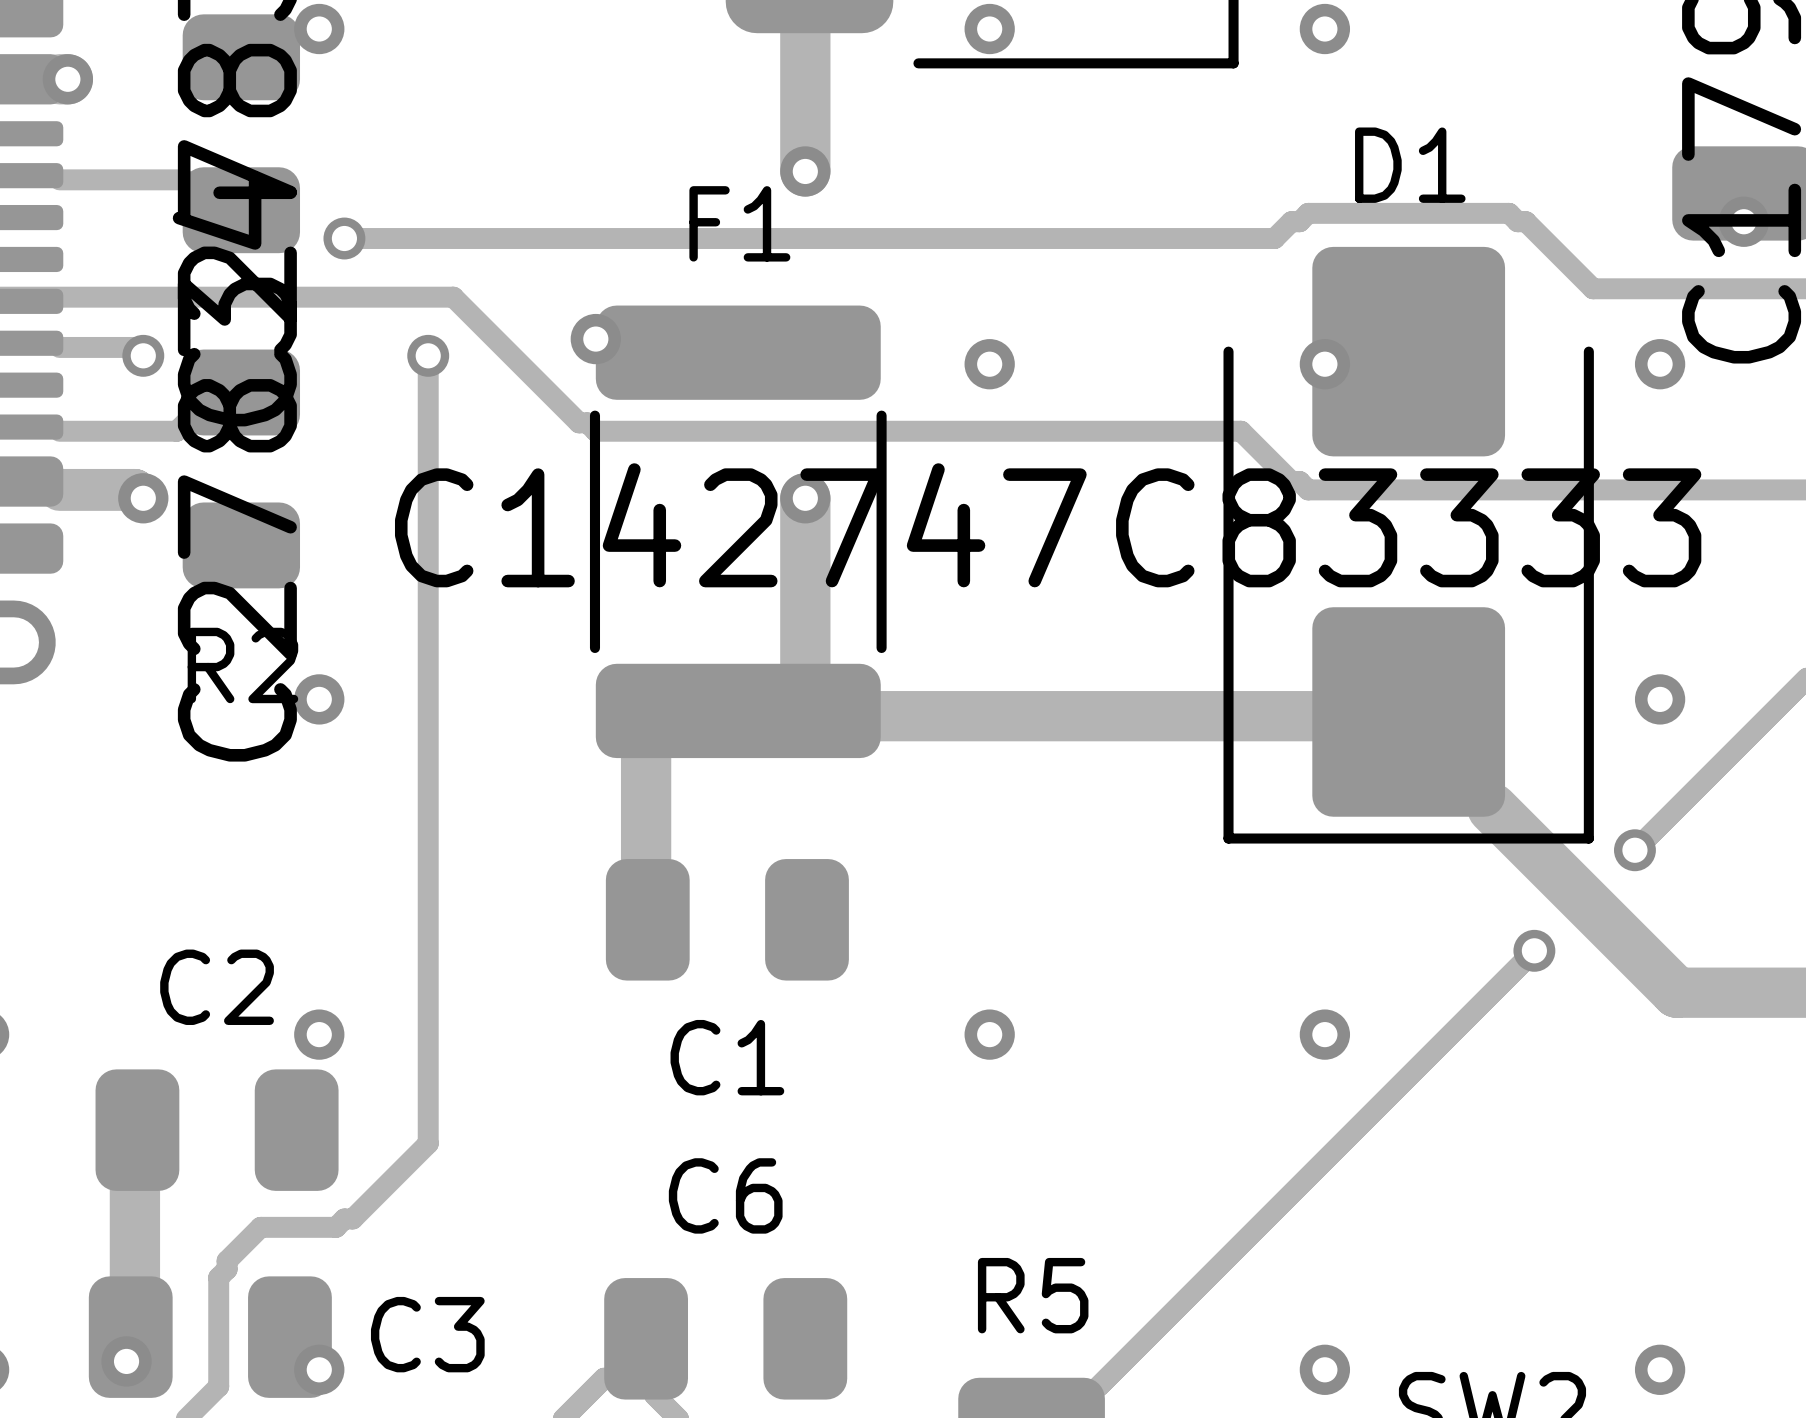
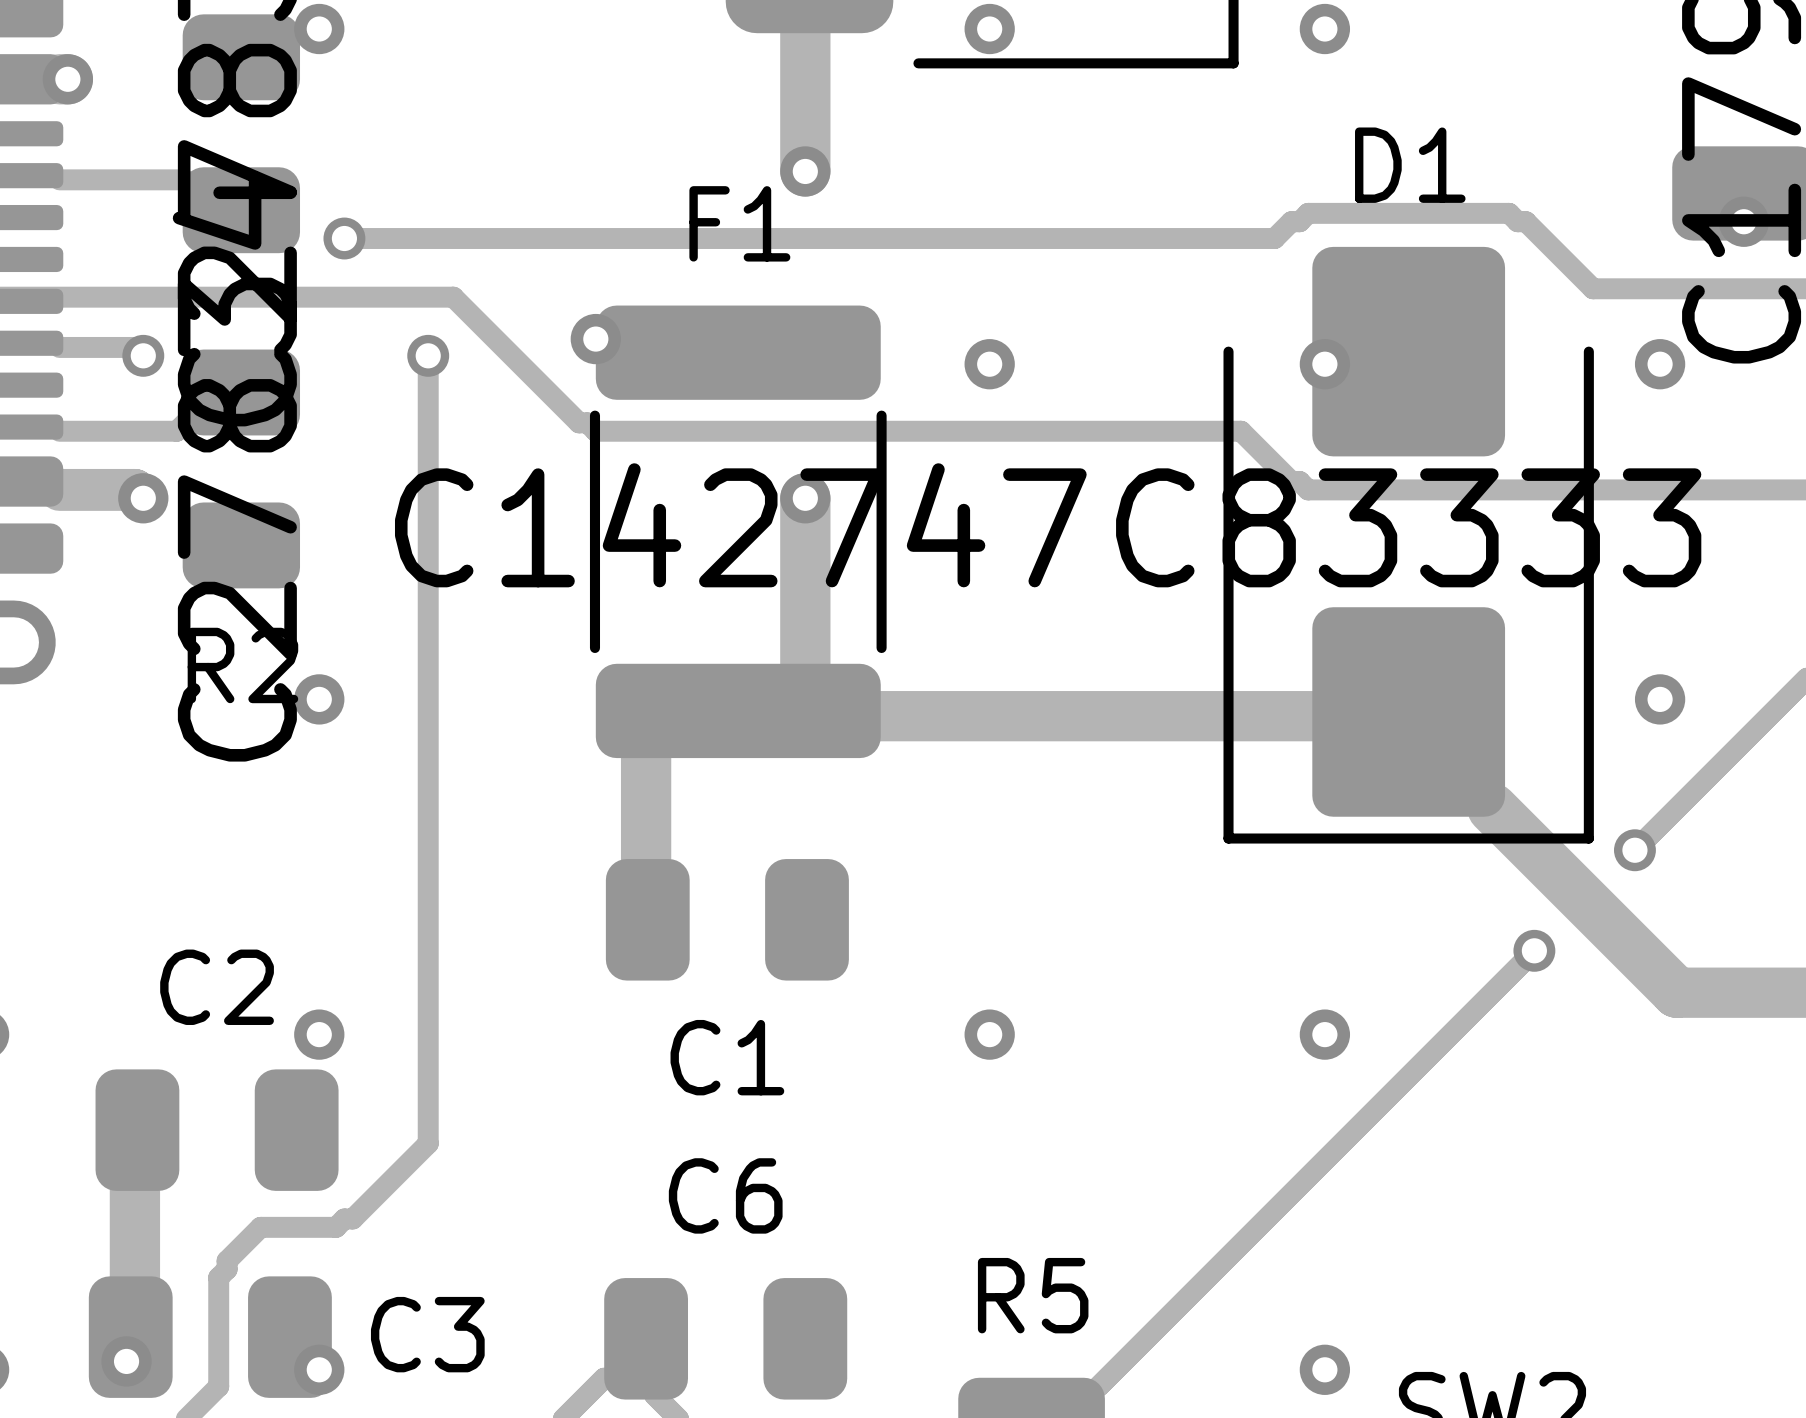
via: (1660, 1369) -> none

